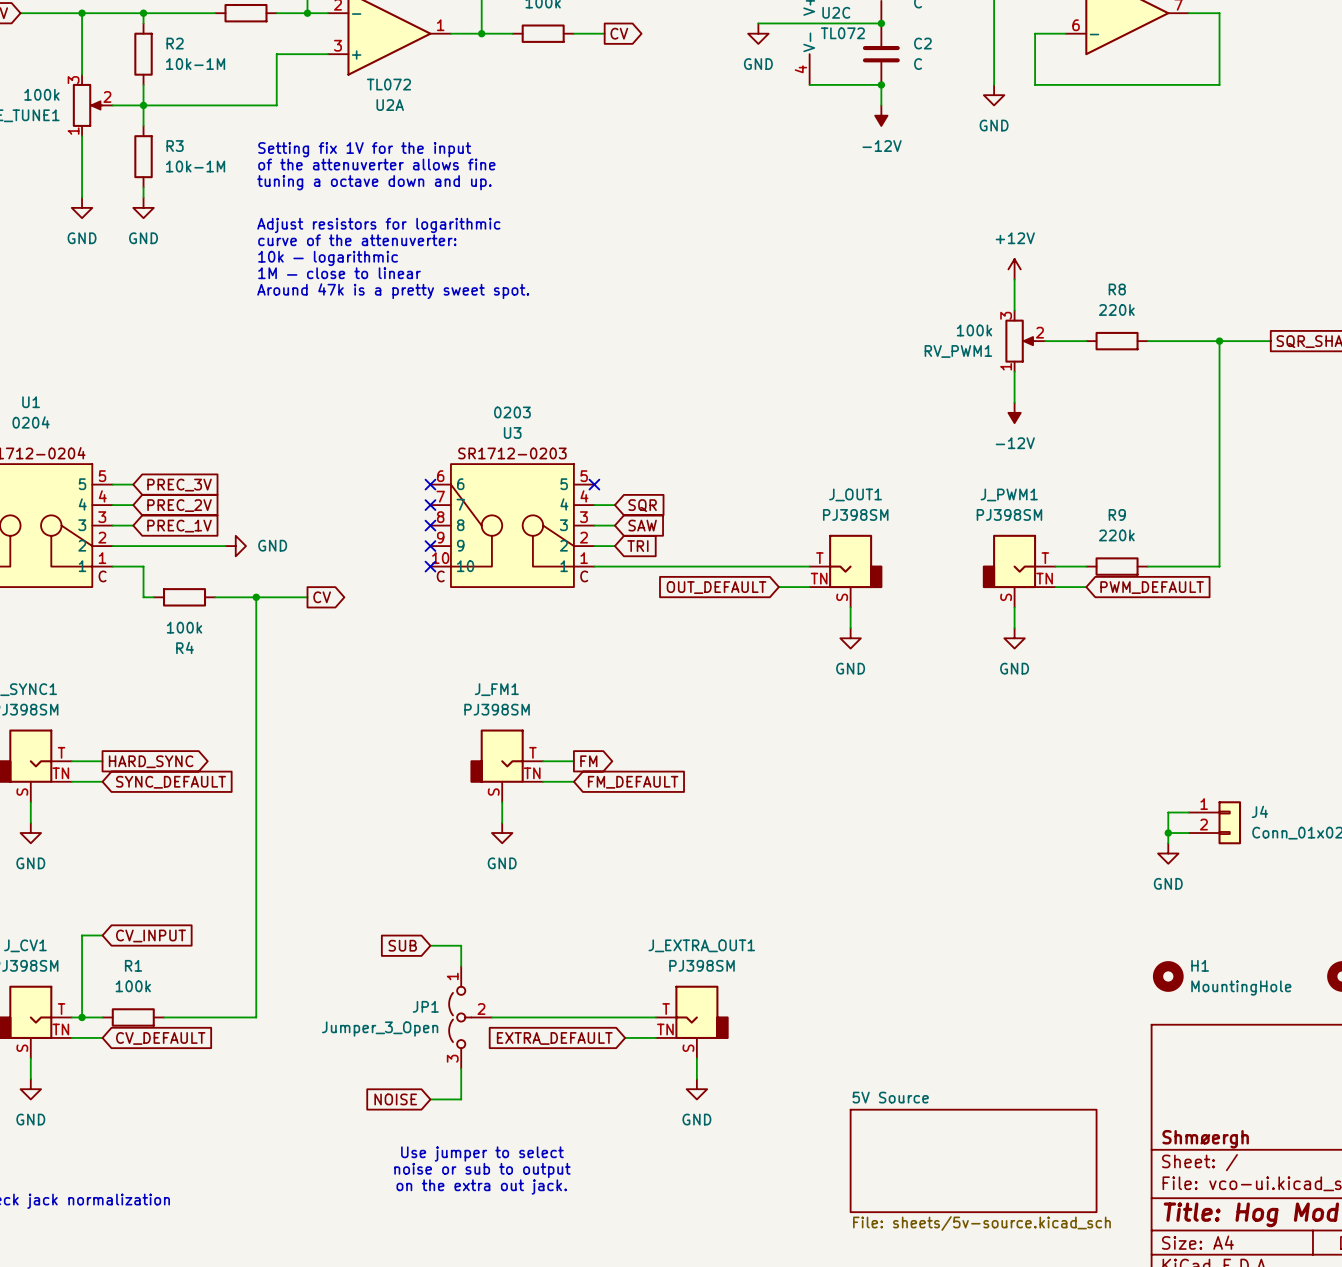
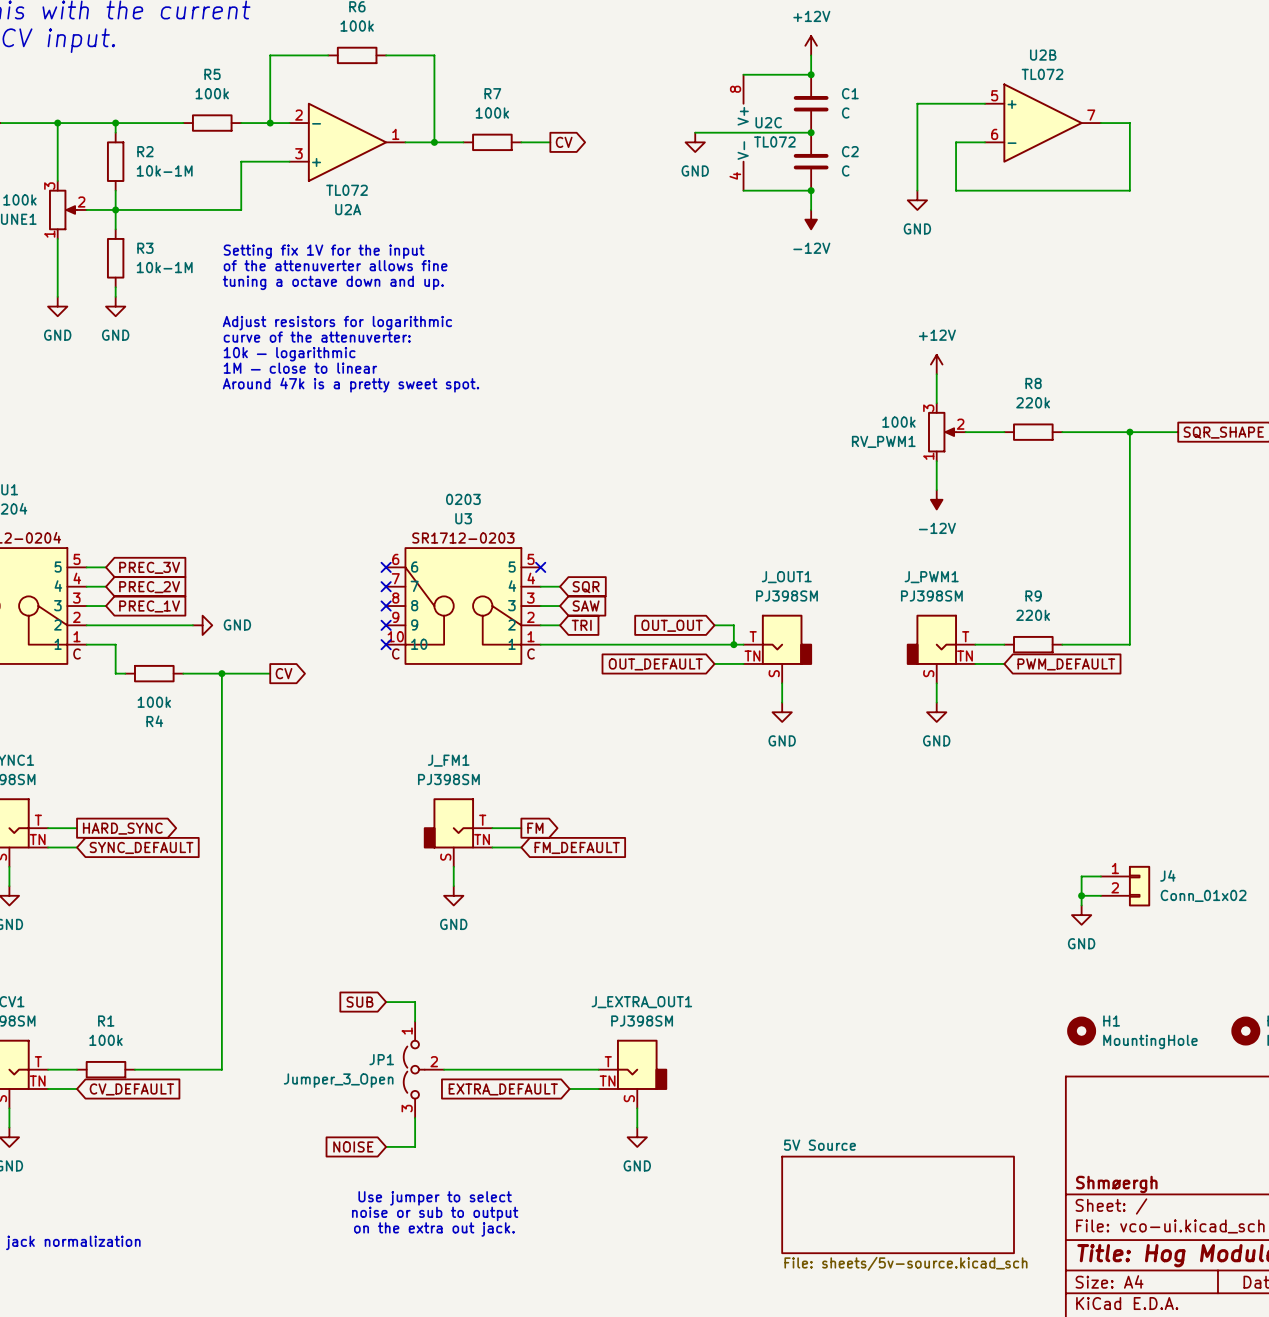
global label: none -> OUT_OUT (672, 625)
wire: none -> (714, 625) (733, 625) (733, 644)
junction: none -> (733, 644)
wire: (102, 935) (82, 935) (82, 1017) -> none
global label: CV_INPUT (150, 935) -> none
junction: (82, 1017) -> none

